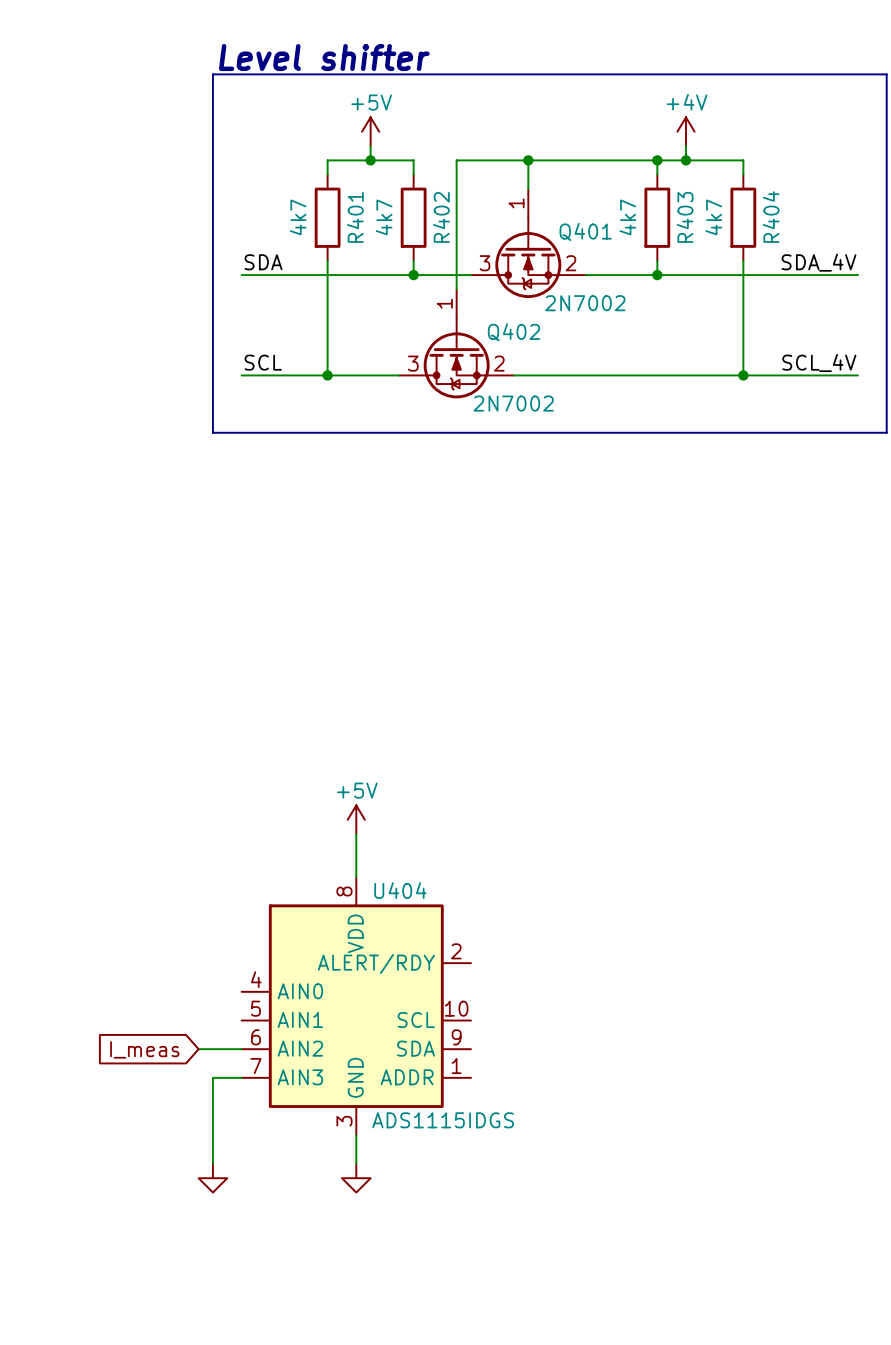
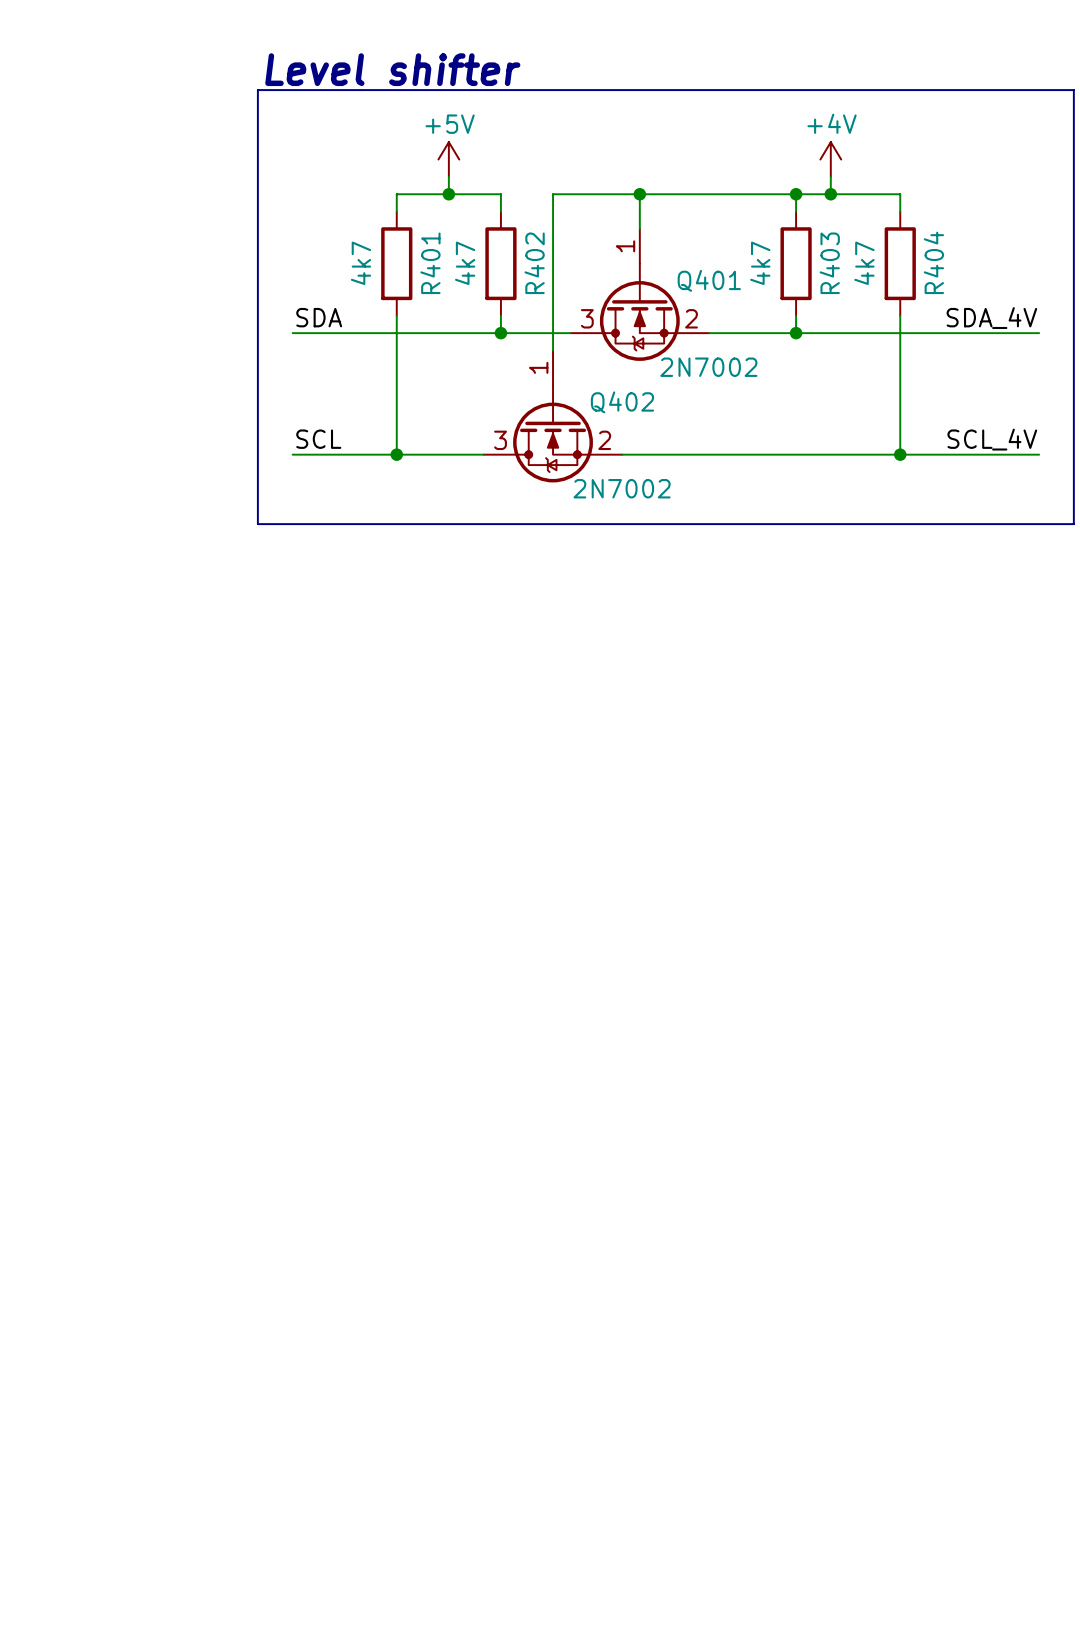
power symbol: +5V (356, 819) -> none
wire: (356, 834) (356, 877) -> none
U404: ADS1115IDGS (356, 1006) -> none
global label: I_meas (144, 1049) -> none
wire: (198, 1049) (241, 1049) -> none
wire: (241, 1077) (212, 1077) (212, 1163) -> none
wire: (356, 1135) (356, 1163) -> none
power symbol: (212, 1178) -> none
power symbol: (356, 1178) -> none

